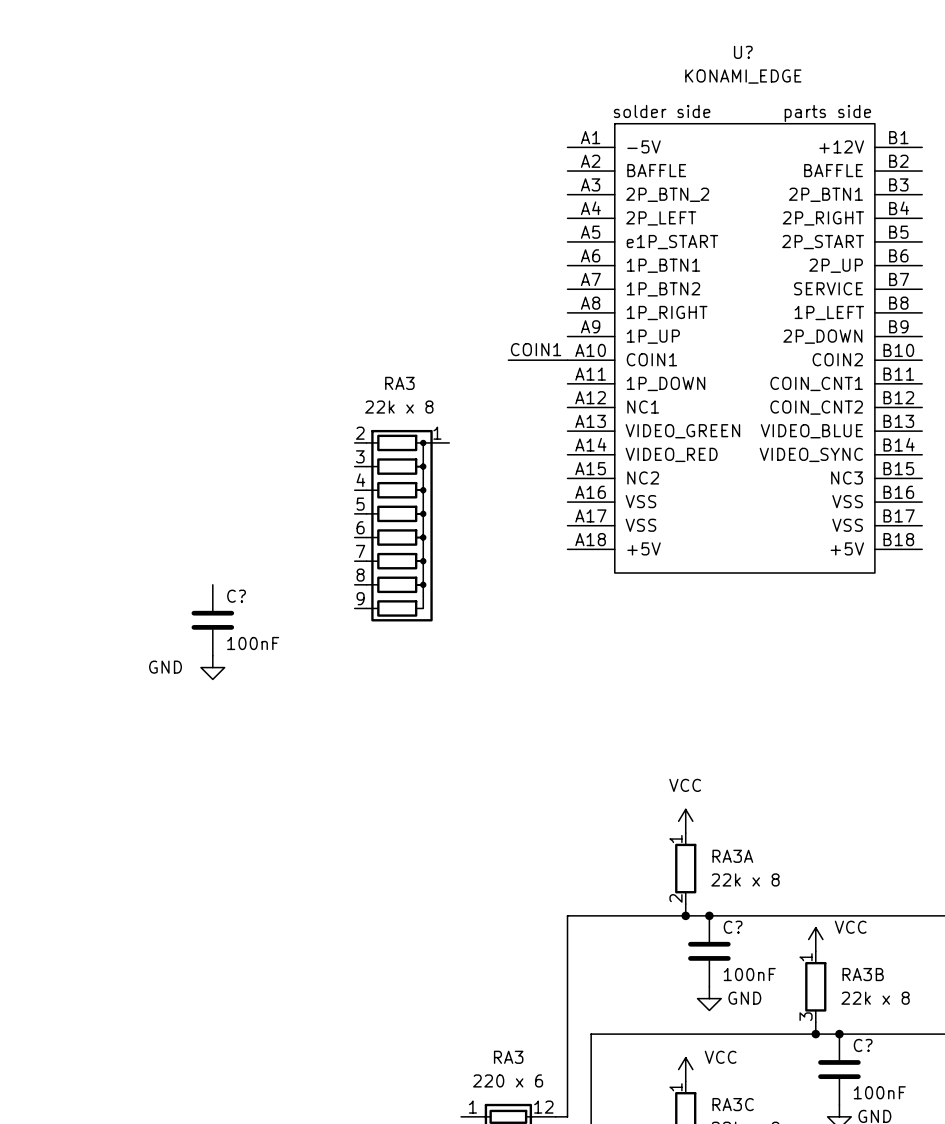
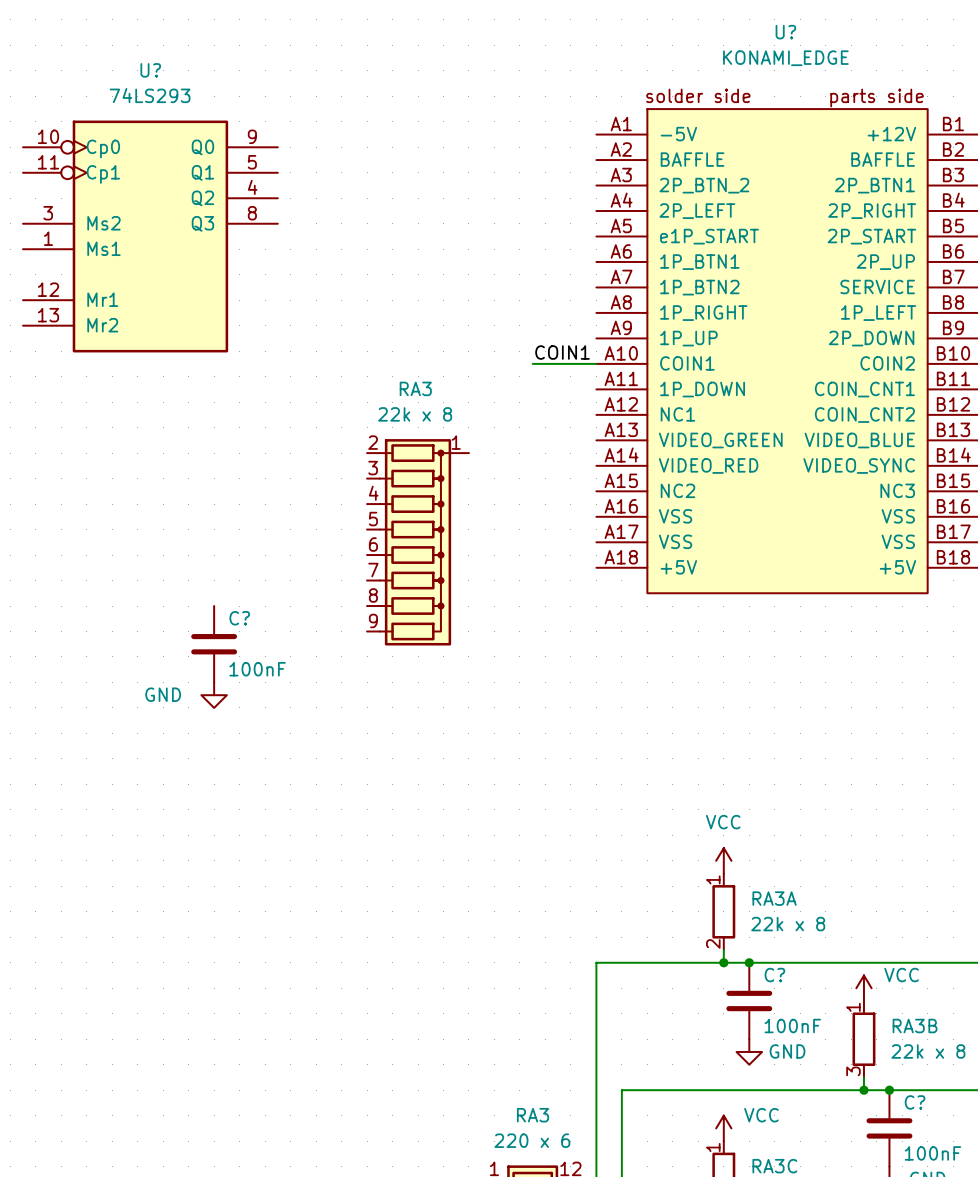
U?: none -> 74LS293 (150, 236)

